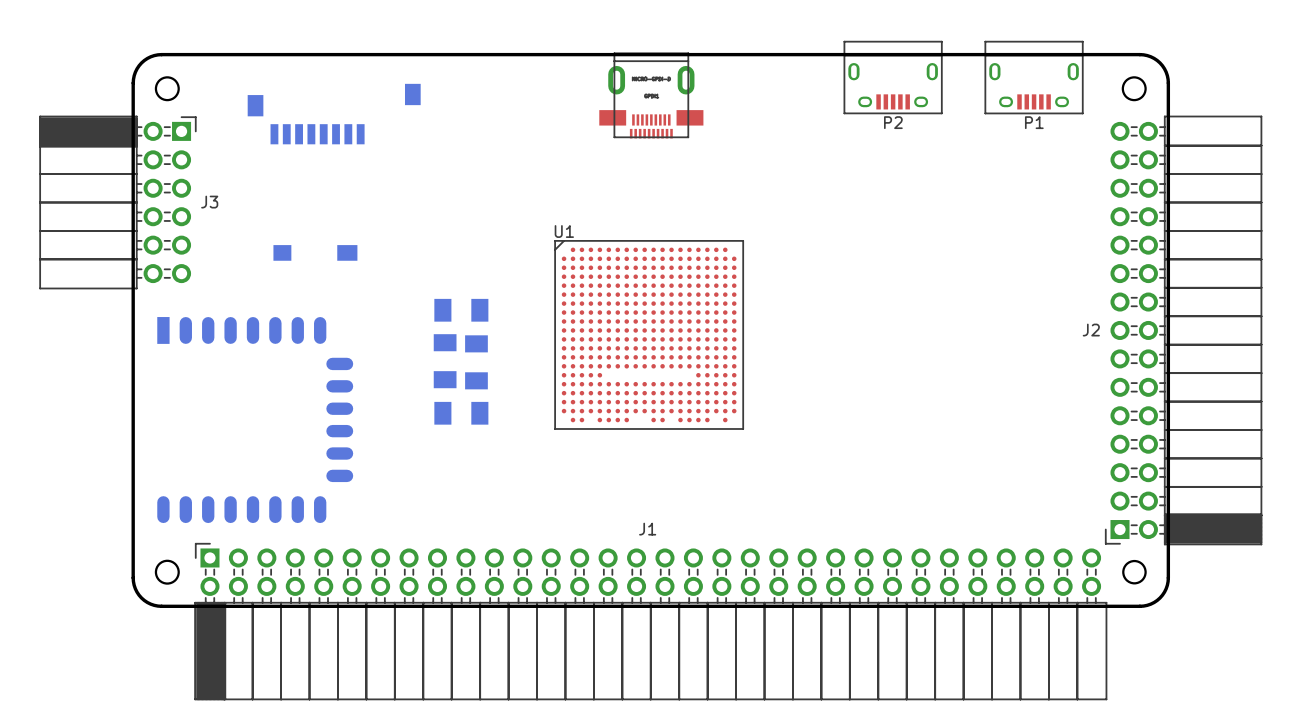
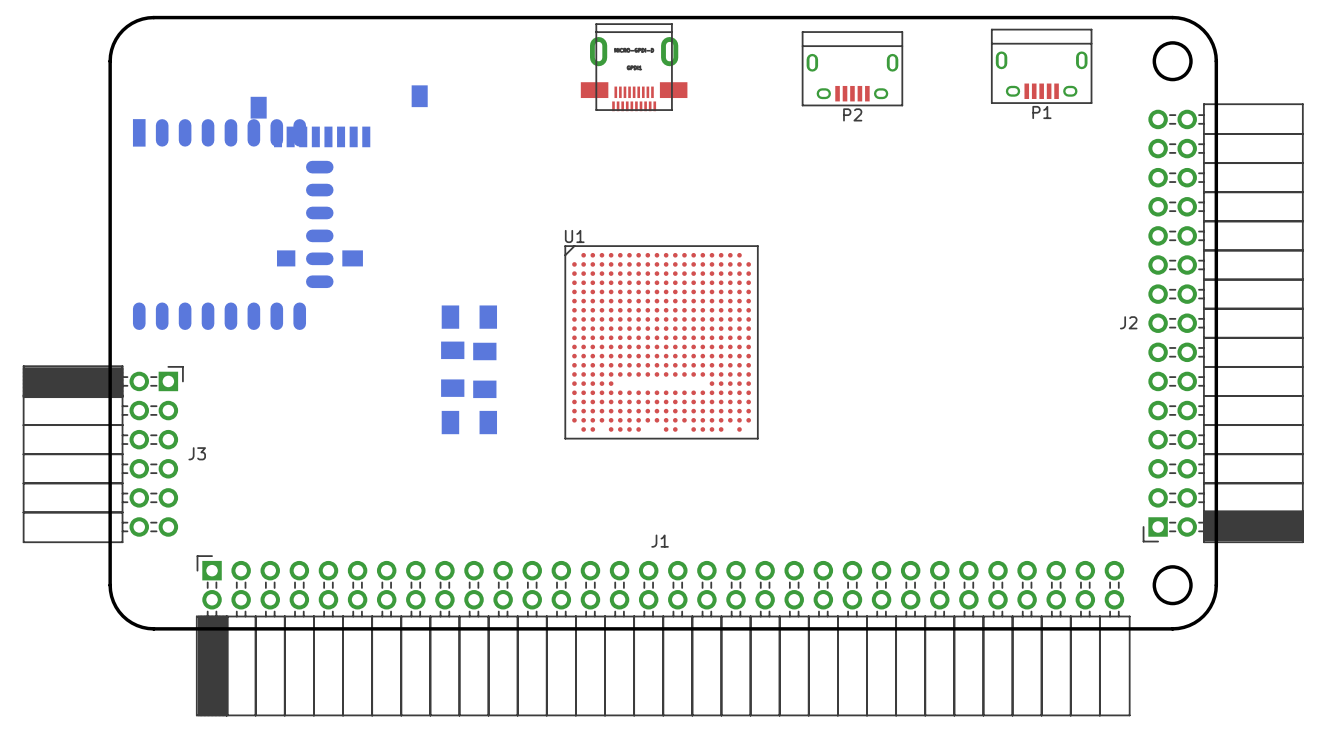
round board edge: none -> [1152, 41, 1193, 82]
round board edge: [154, 76, 180, 102] -> none
round board edge: [1121, 76, 1147, 102] -> none
P2 position: (893, 77) -> (852, 68)
P1 position: (1034, 77) -> (1041, 66)
board edge: (133, 83) (133, 577) (139, 595) (150, 604) (161, 606) (1139, 606) (1154, 602) (1166, 588) (1168, 577) (1168, 83) (1164, 68) (1150, 56) (1139, 54) (161, 54) (150, 56) (141, 62) (135, 72) (133, 83) -> (153, 17) (137, 20) (122, 30) (113, 44) (110, 61) (110, 585) (116, 607) (131, 623) (153, 628) (1172, 628) (1194, 623) (1210, 607) (1216, 585) (1216, 61) (1210, 39) (1194, 23) (1172, 17) (153, 17)
part position: (651, 95) -> (634, 67)
J3 position: (117, 202) -> (103, 454)
J2 position: (1183, 330) -> (1223, 323)
part position: (255, 420) -> (233, 224)
round board edge: none -> [1152, 565, 1193, 606]
round board edge: [154, 559, 180, 585] -> none
round board edge: [1122, 559, 1147, 585] -> none

